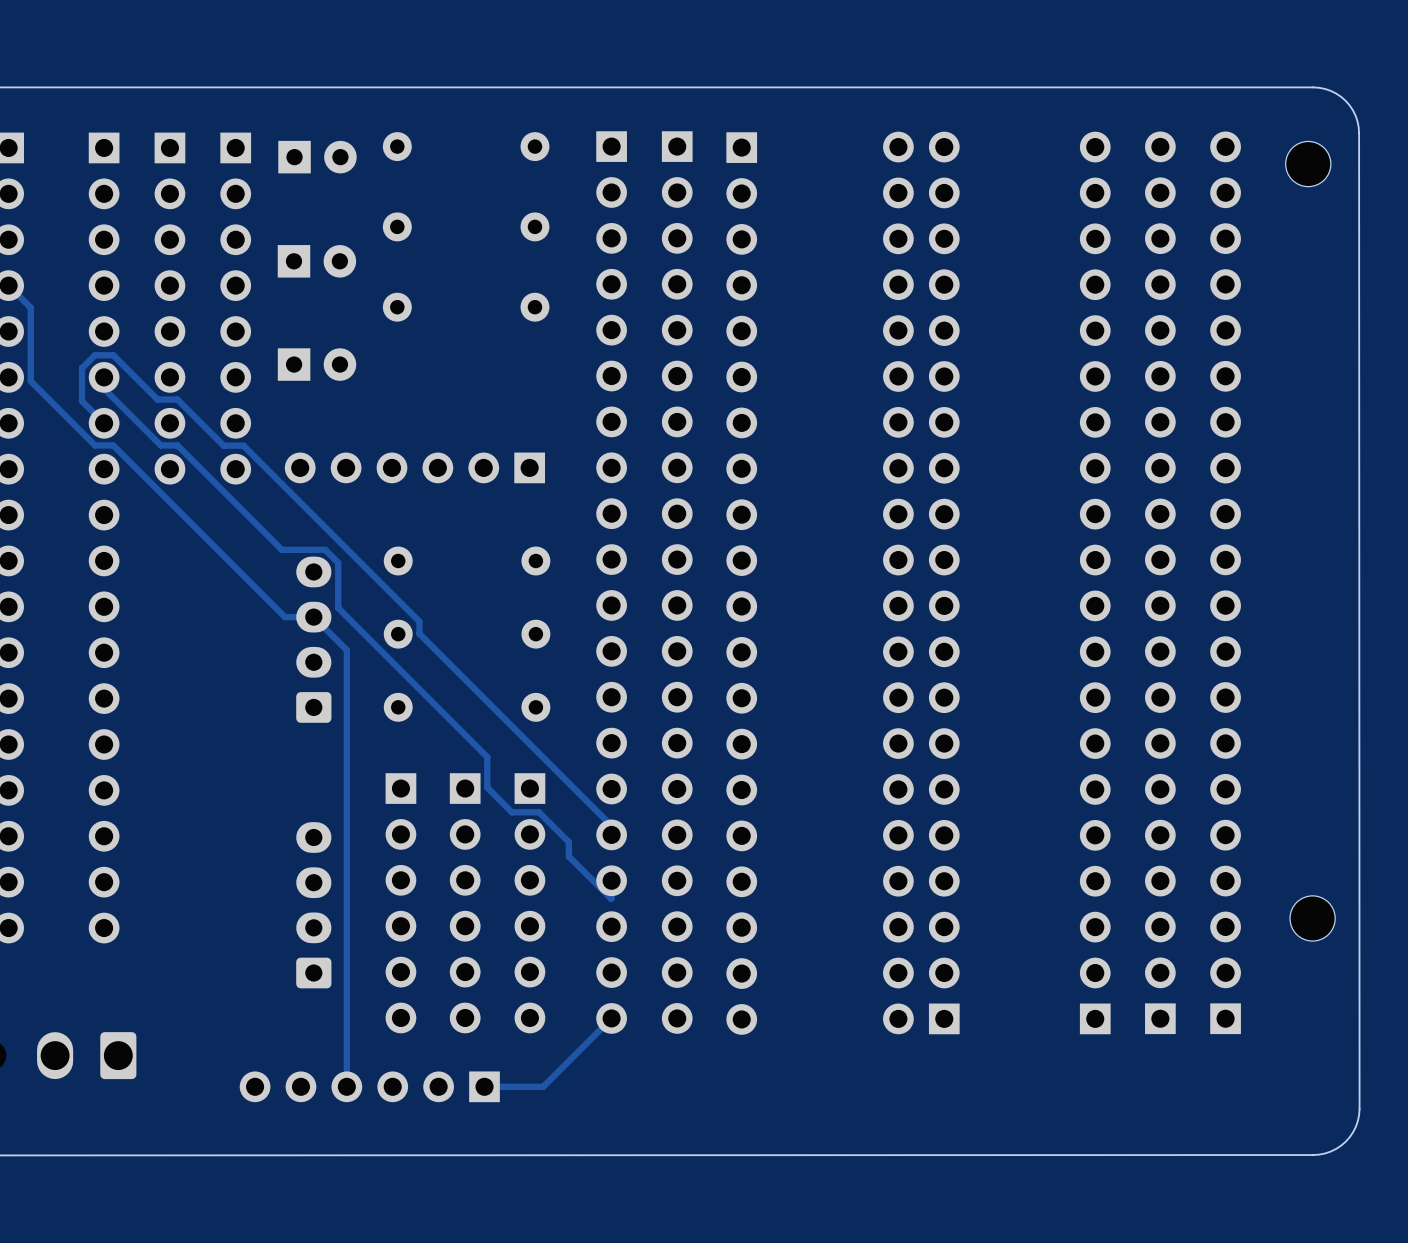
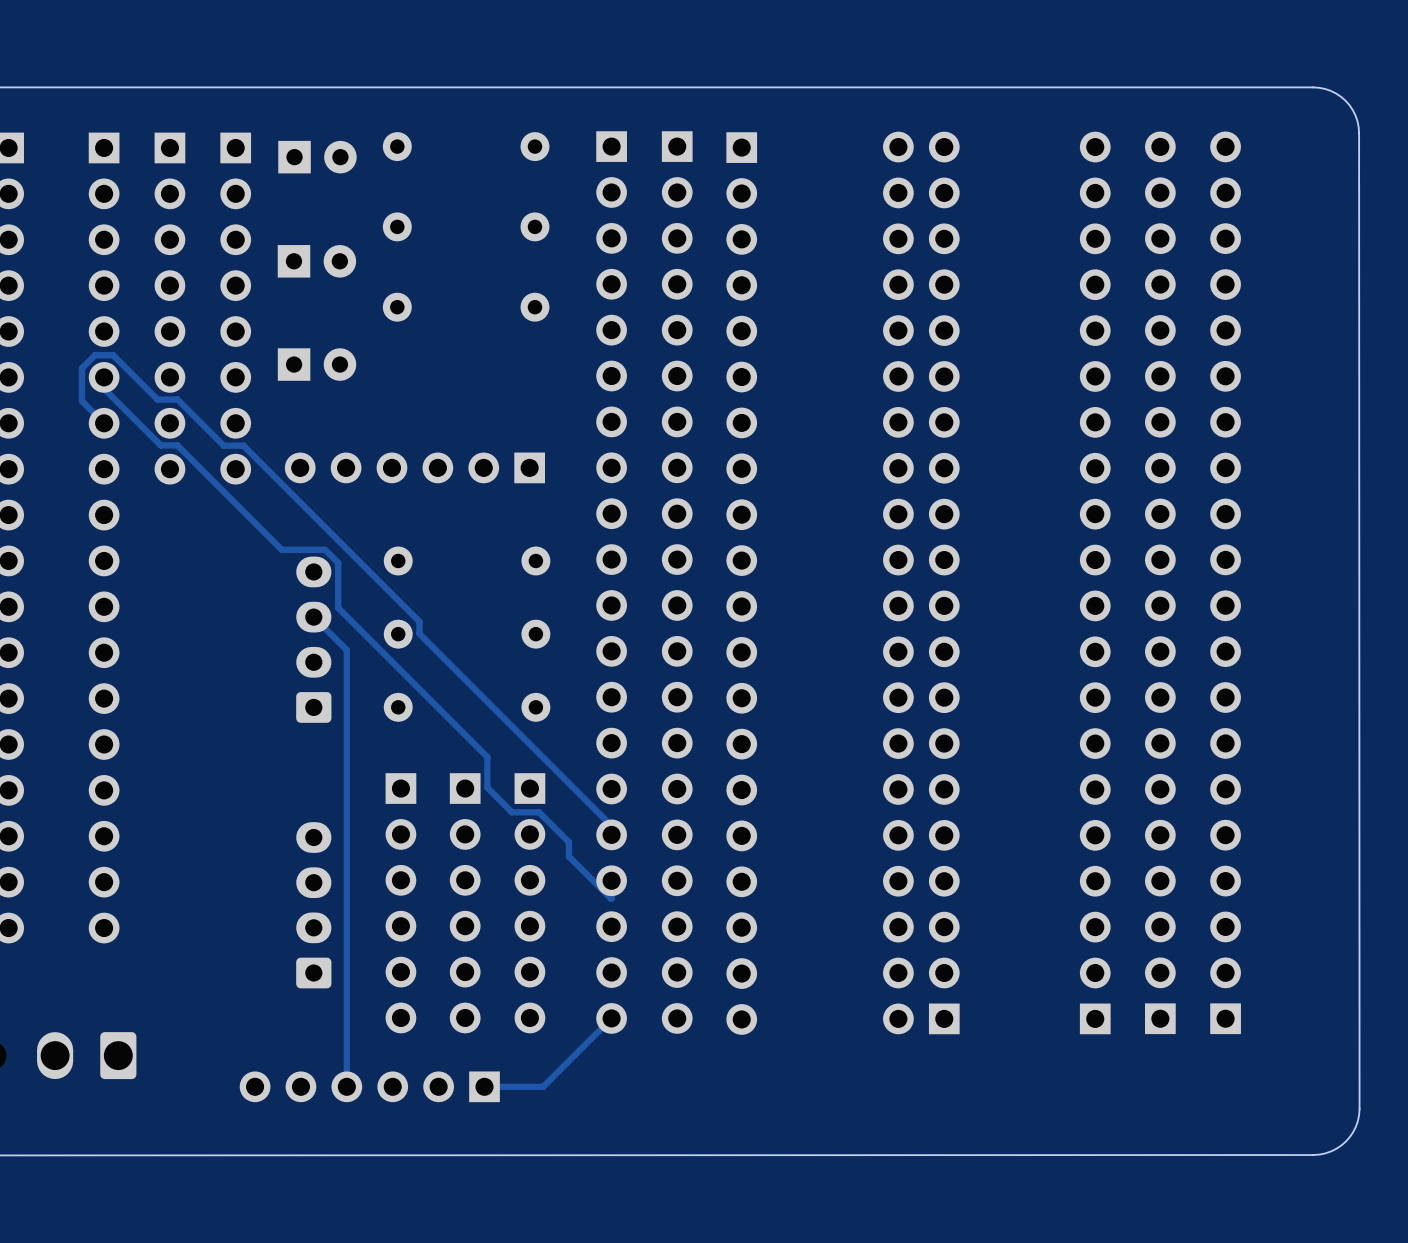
part: (1308, 164) -> none
track: (8, 285) (30, 307) (30, 381) (94, 445) (113, 445) (284, 617) (313, 617) -> none
part: (1312, 918) -> none

